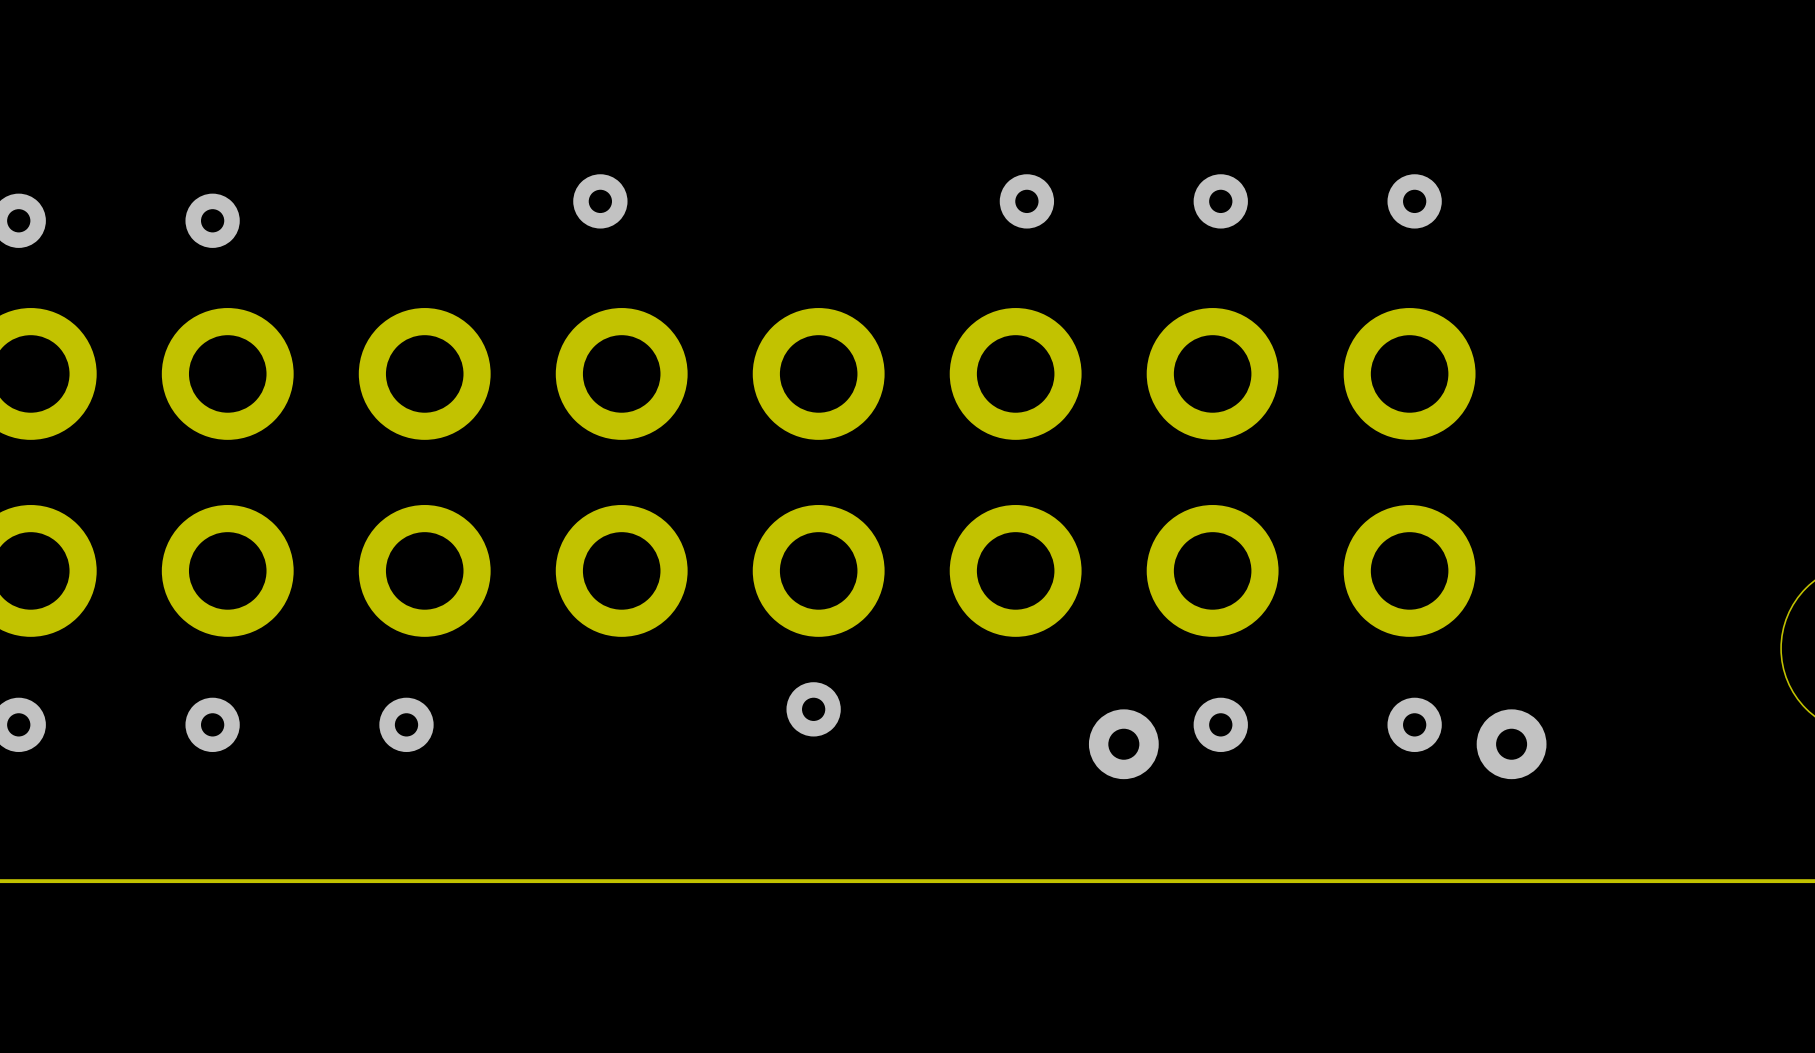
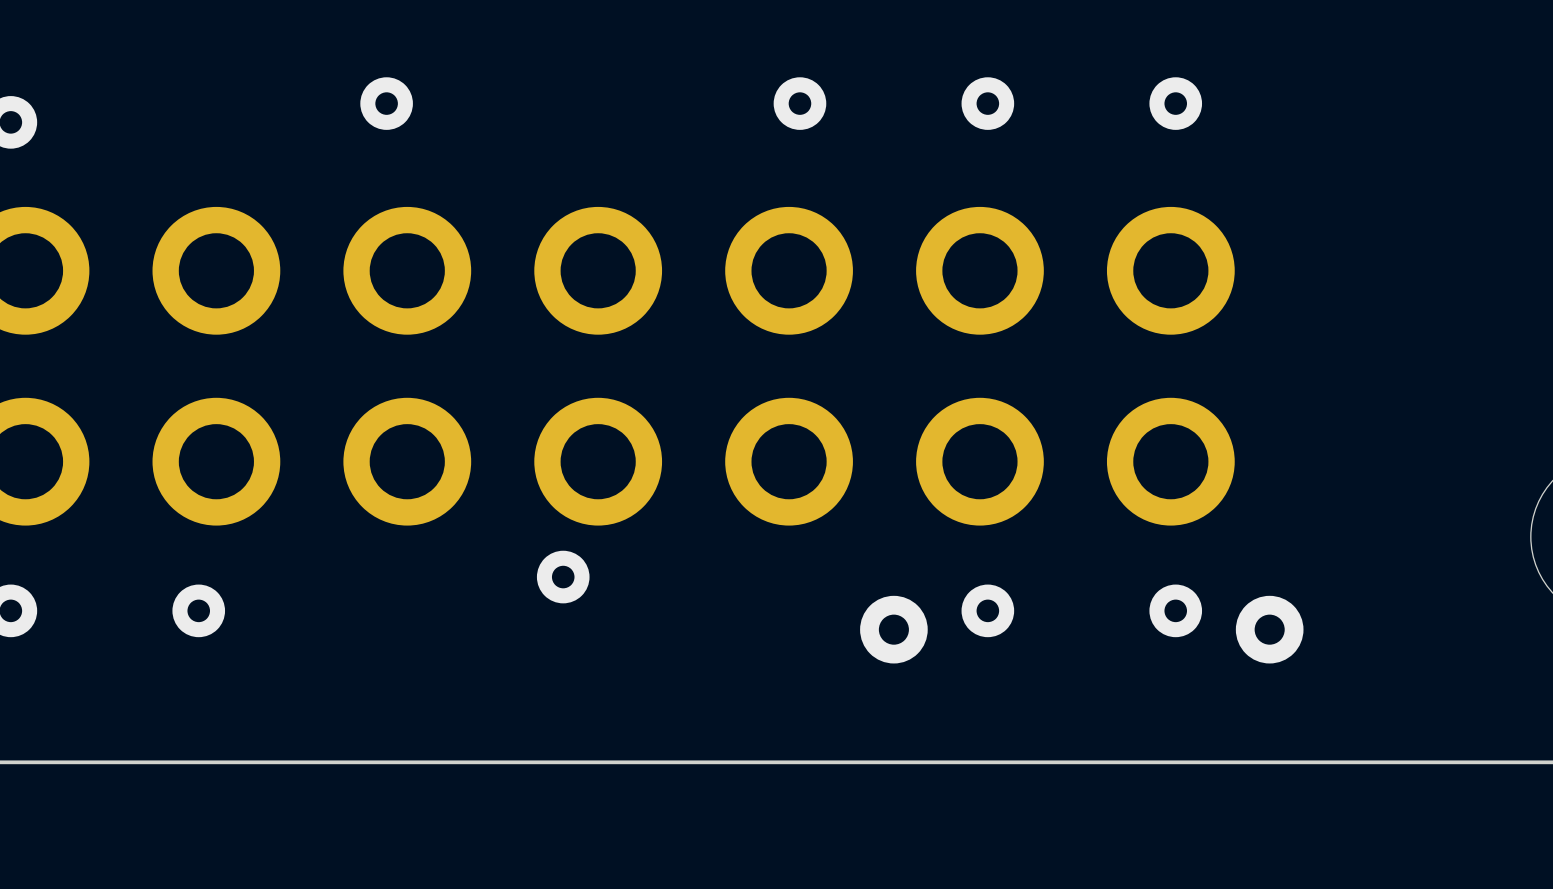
via position: (813, 709) -> (563, 577)

